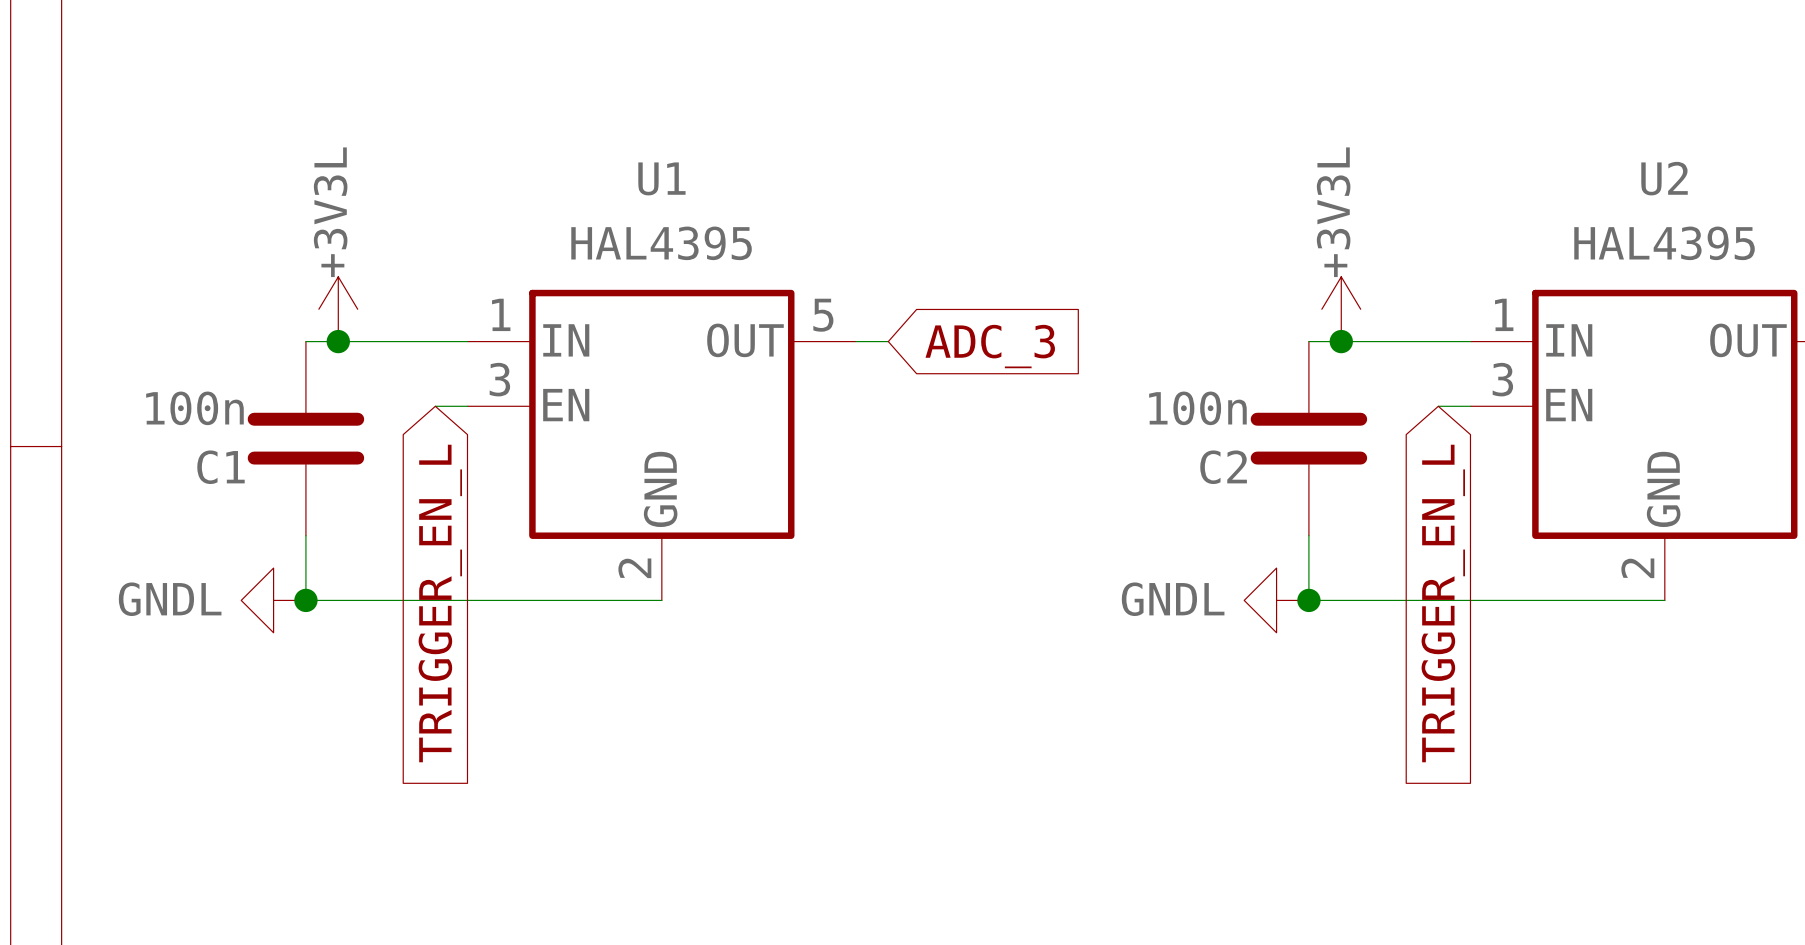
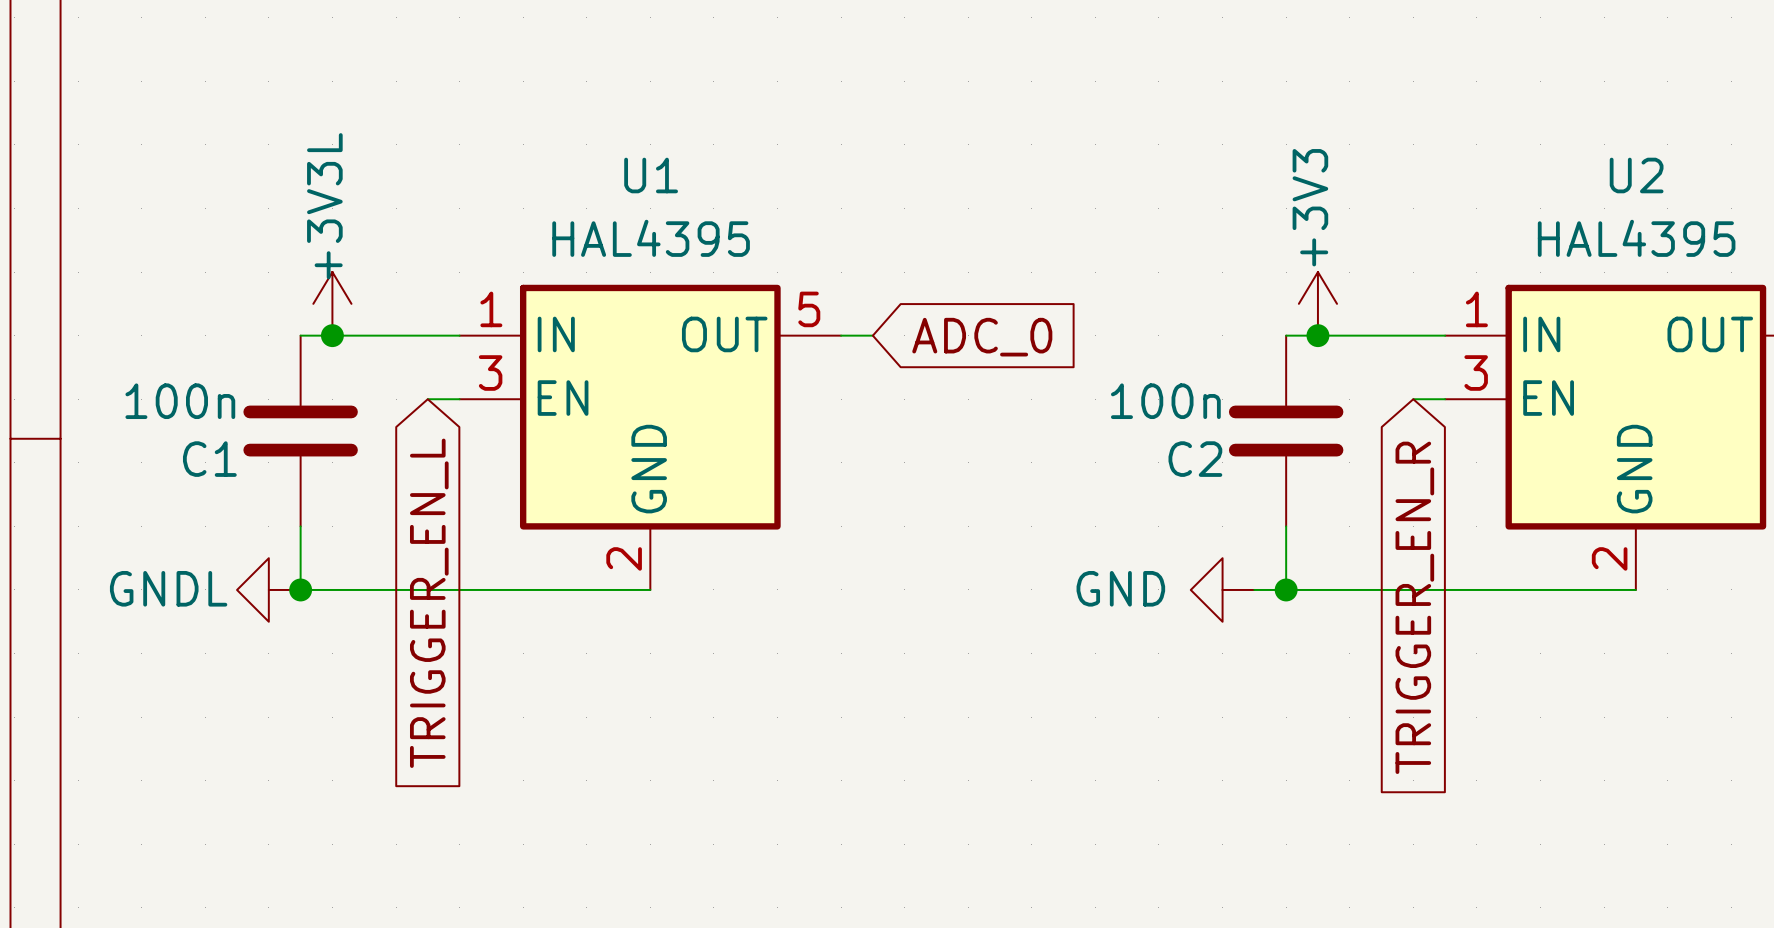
power symbol: +3V3L (1341, 309) -> +3V3 (1317, 303)
global label: ADC_3 (990, 346) -> ADC_0 (982, 337)
power symbol: none -> GND (1222, 589)
power symbol: GNDL (1276, 600) -> none
global label: TRIGGER_EN_L (1443, 603) -> TRIGGER_EN_R (1414, 607)

